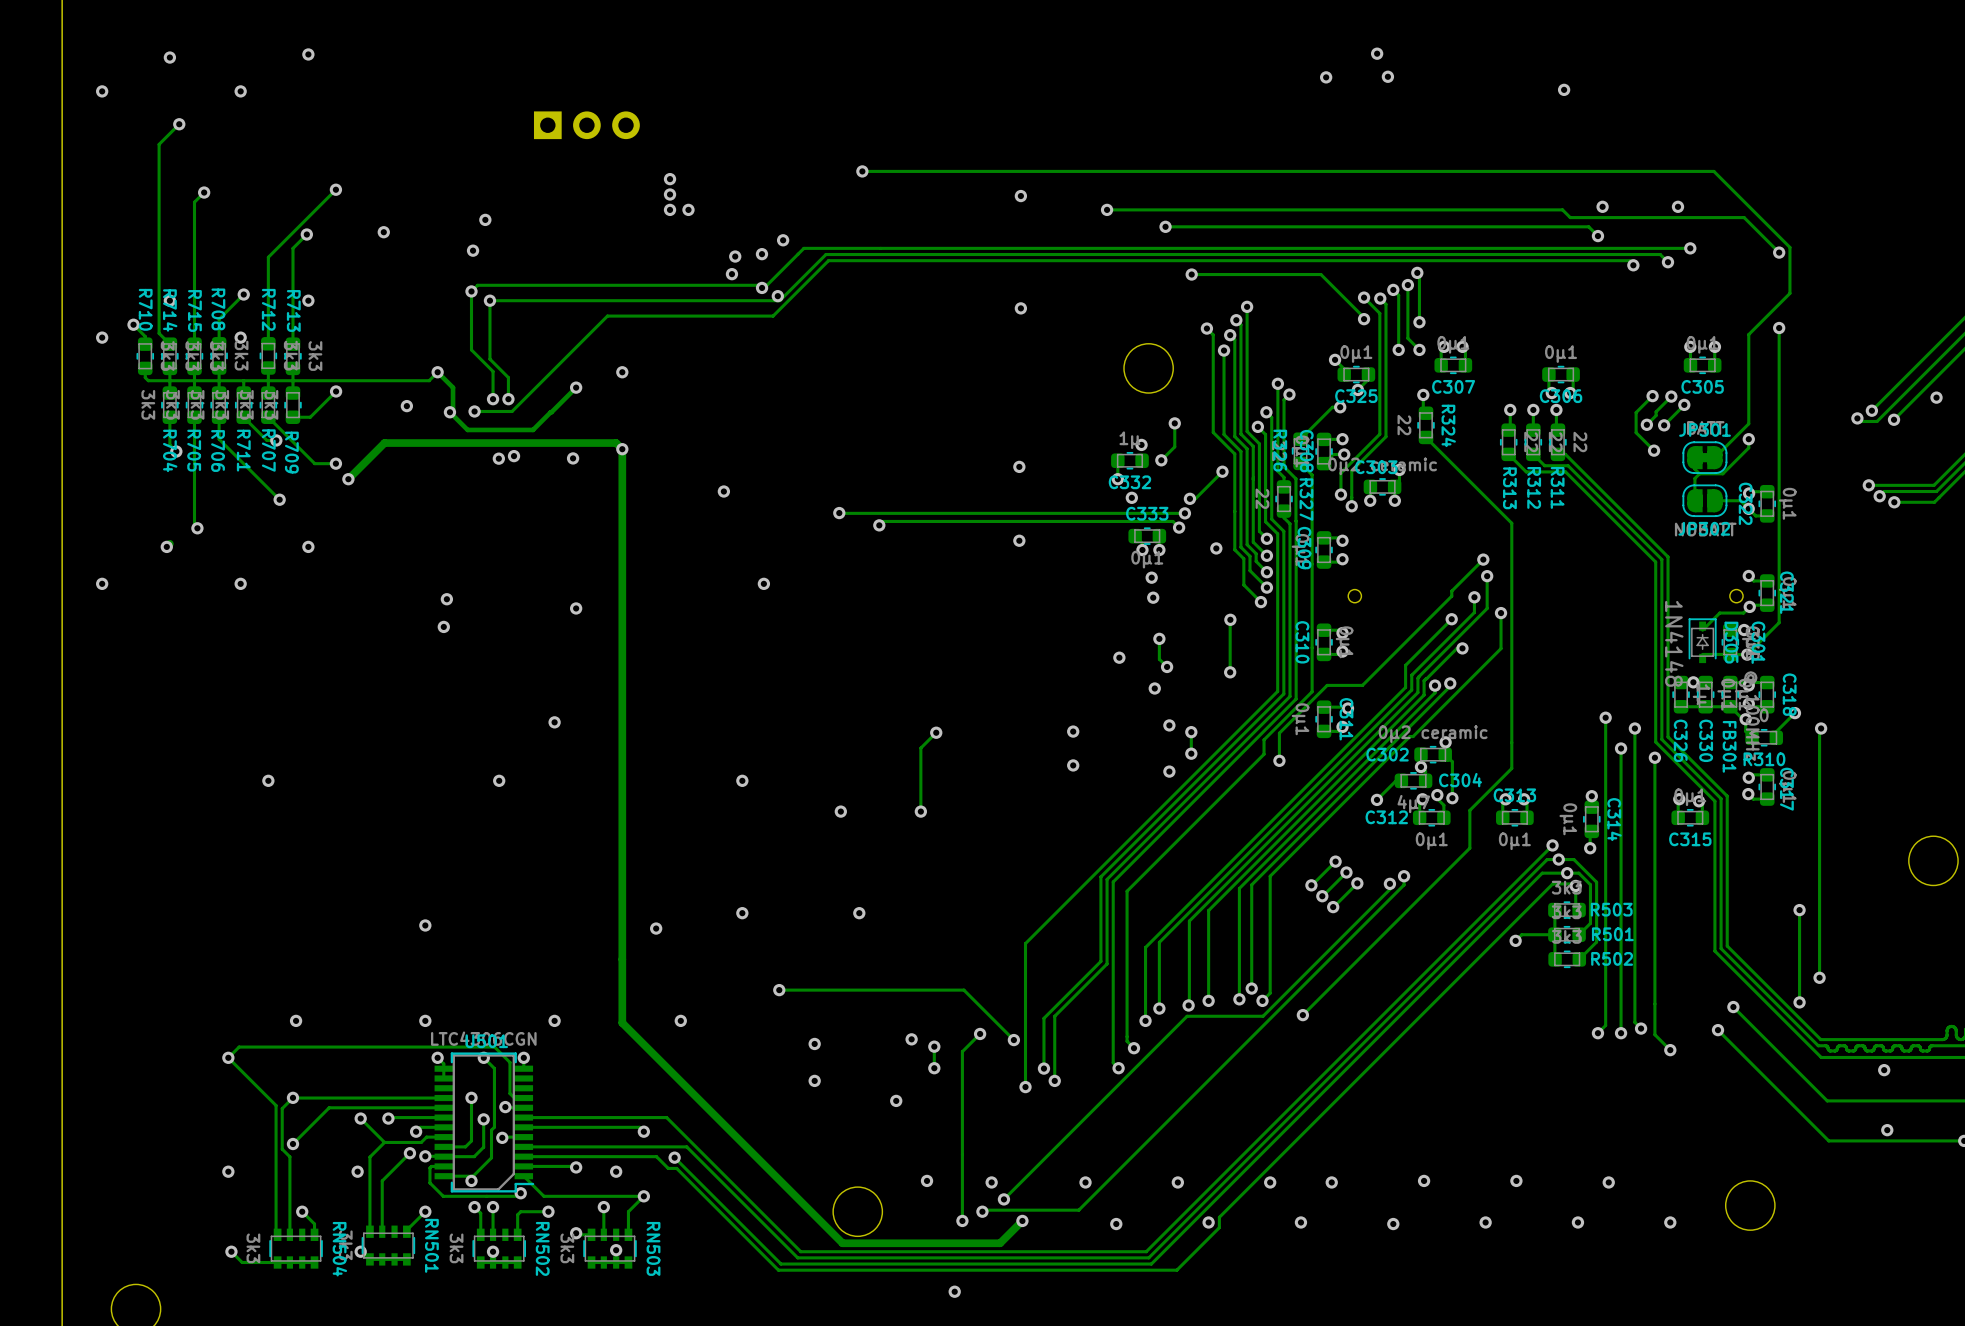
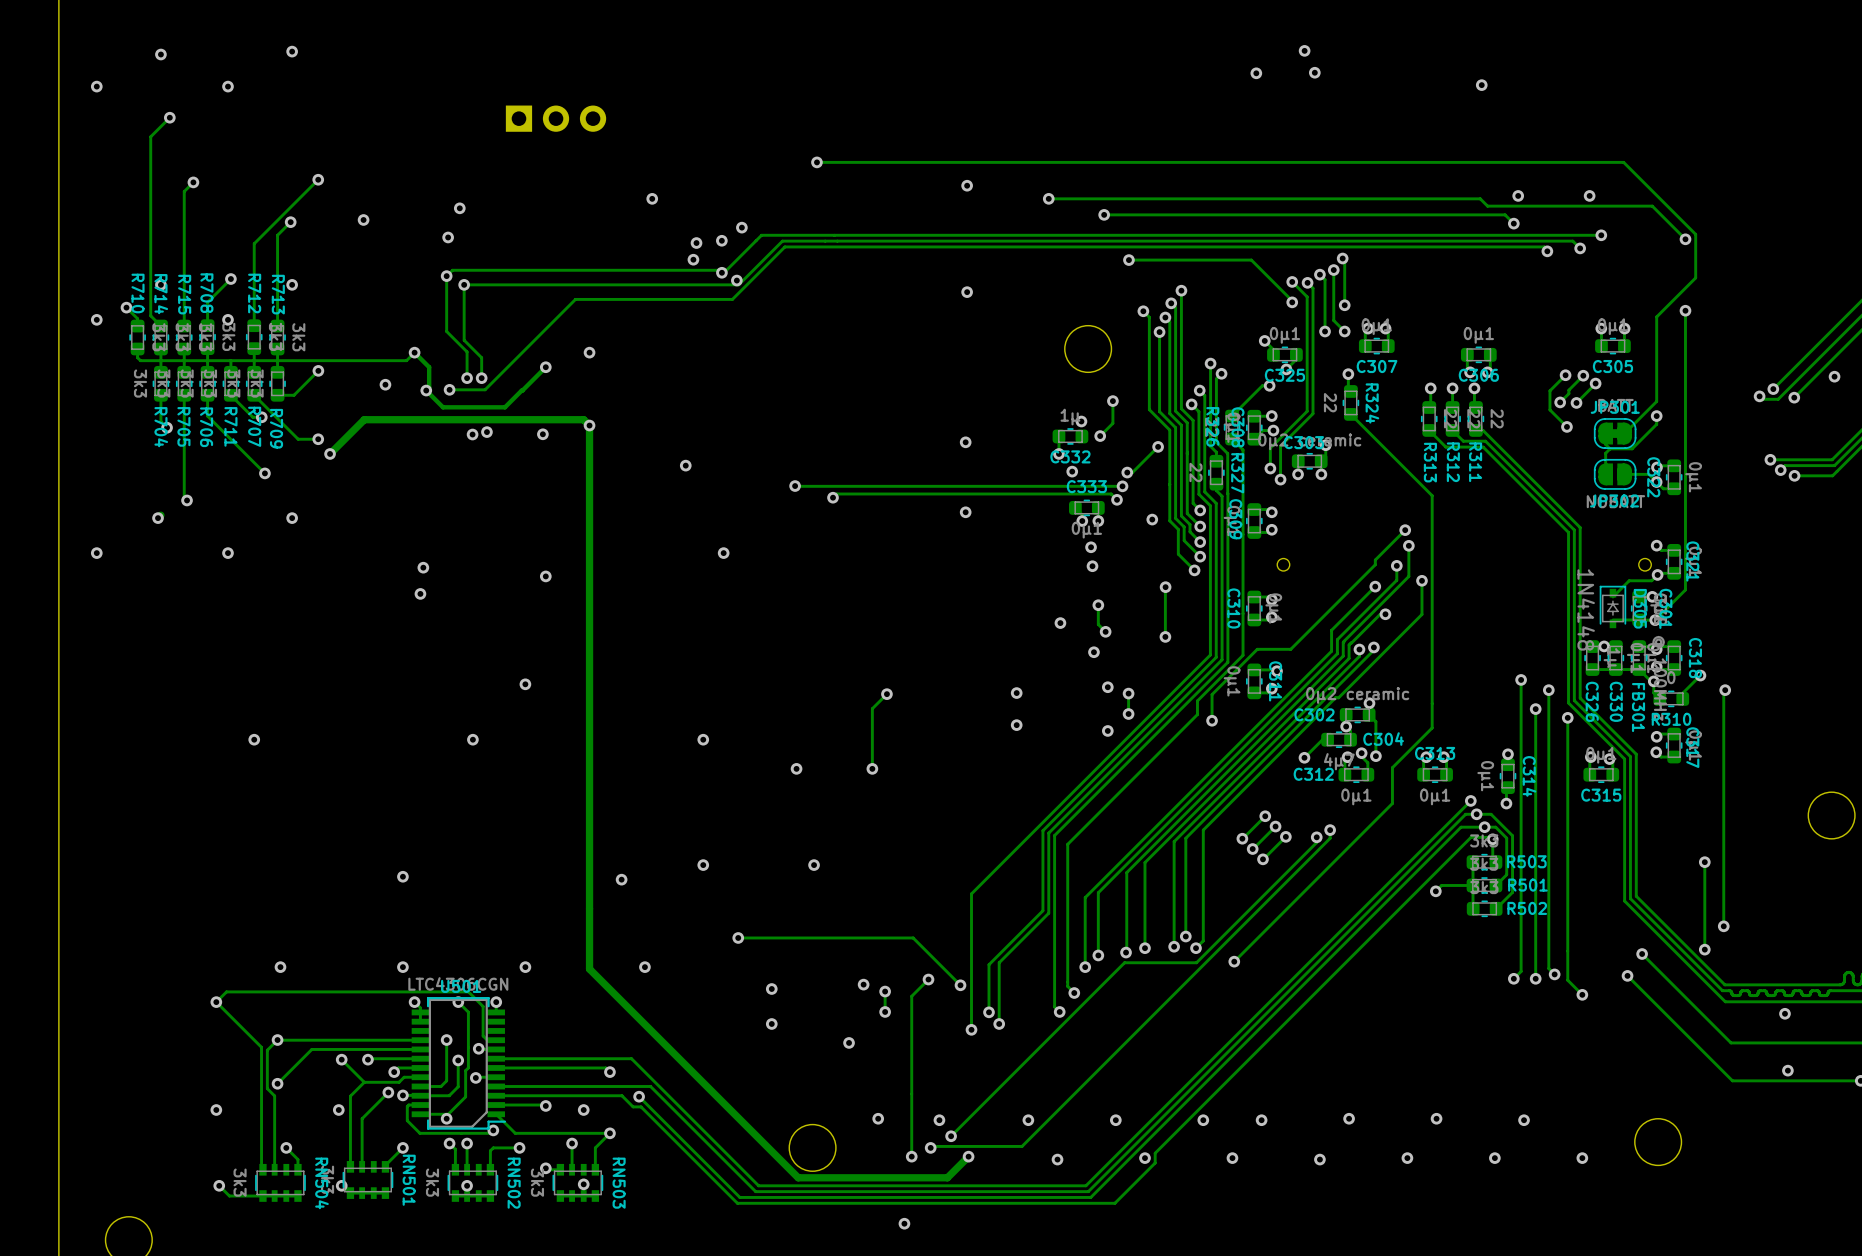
via: (670, 179) -> none
via: (670, 194) -> none
via: (670, 209) -> none

